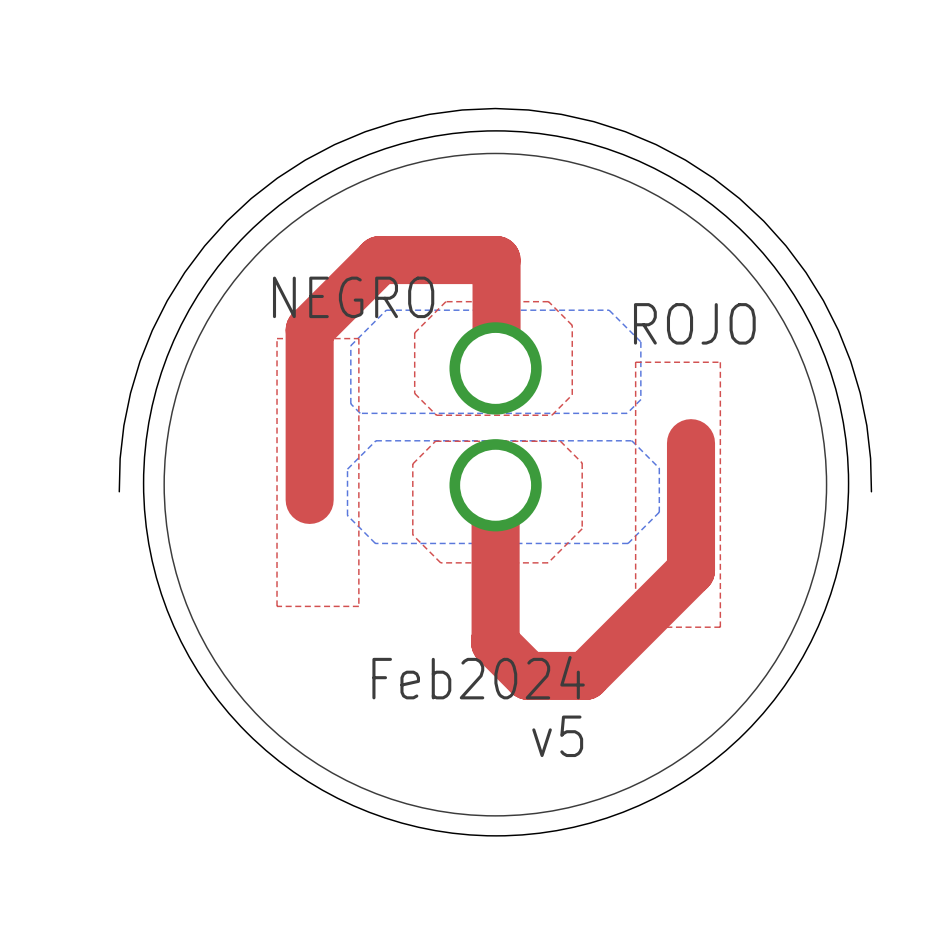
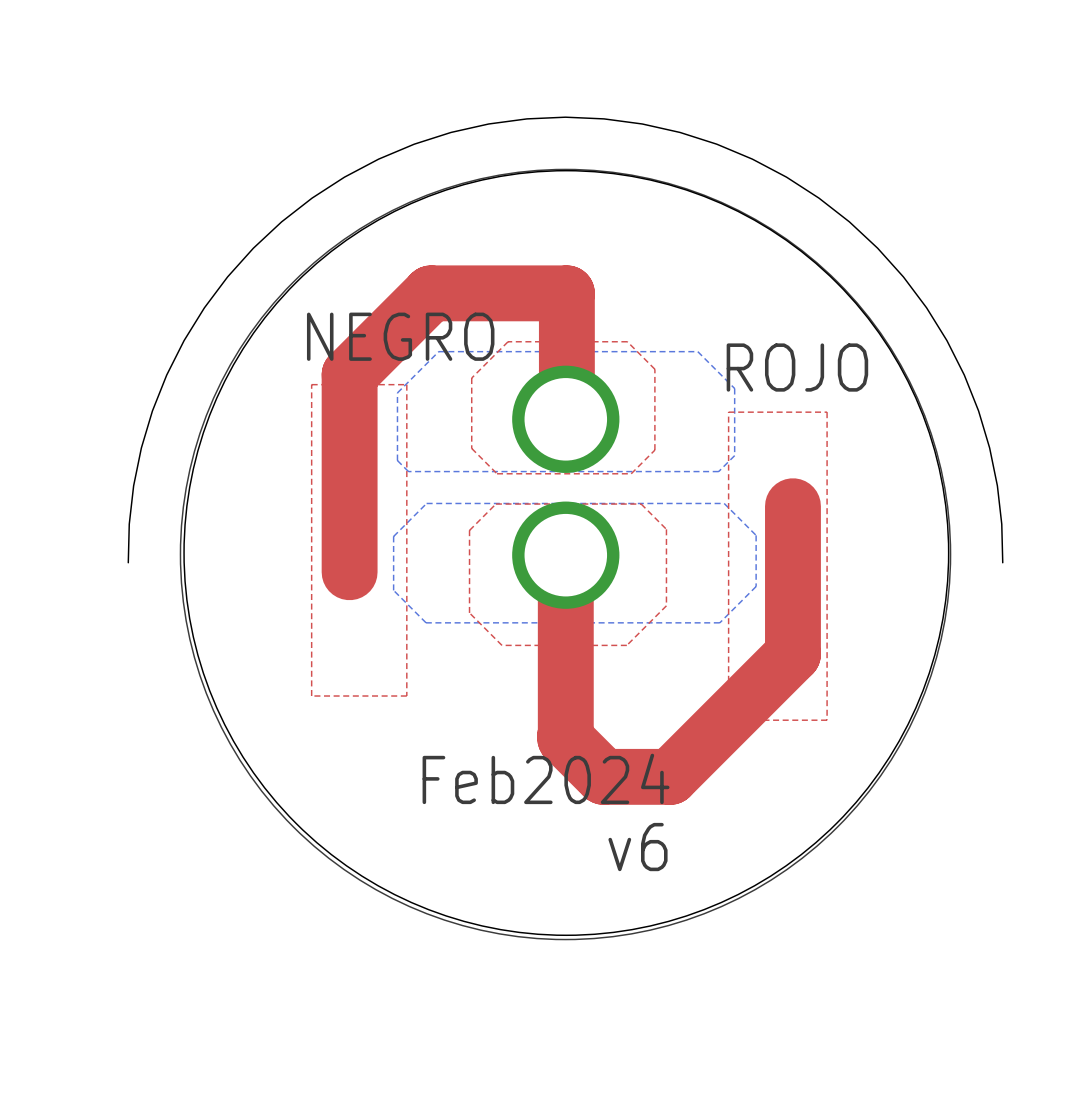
round board edge size: [143, 130, 849, 837] -> [183, 170, 949, 936]
text: v5 (557, 736) -> v6 (638, 847)

